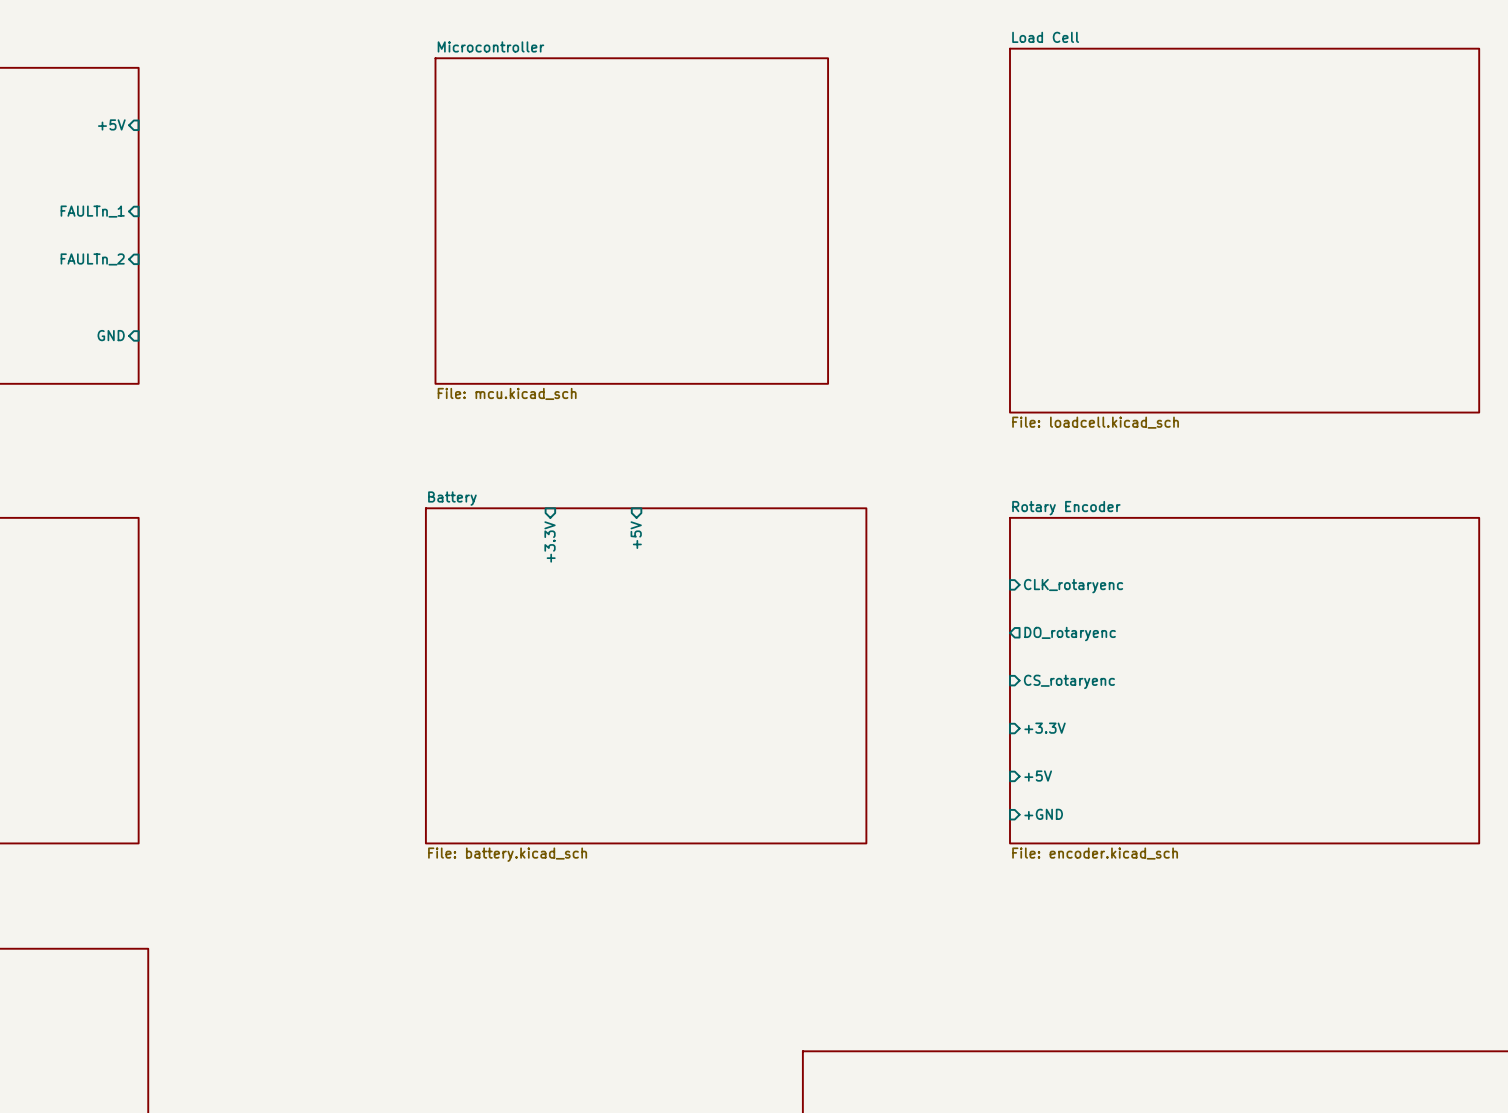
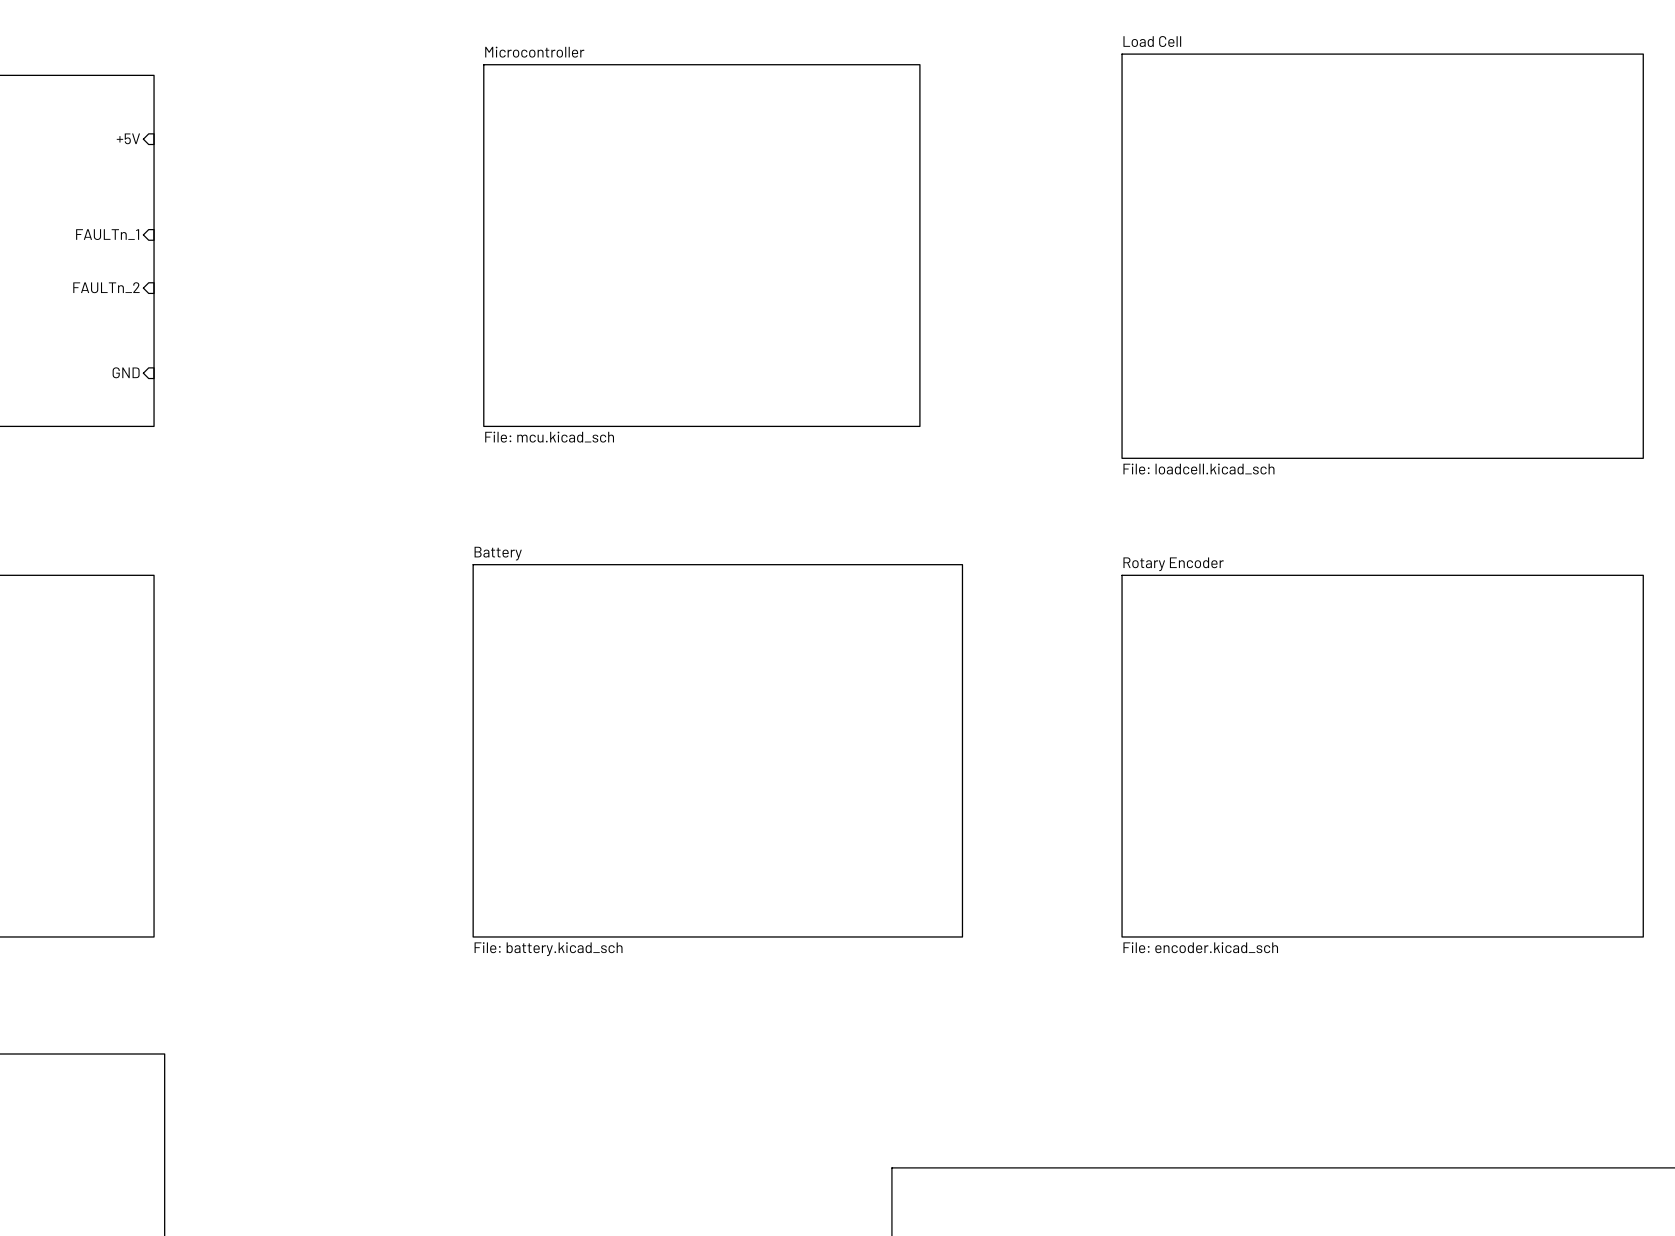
sheet pin: +5V (636, 535) -> none
sheet pin: +3.3V (550, 541) -> none
sheet pin: CLK_rotaryenc (1073, 586) -> none
sheet pin: DO_rotaryenc (1070, 634) -> none
sheet pin: CS_rotaryenc (1069, 681) -> none
sheet pin: +3.3V (1045, 728) -> none
sheet pin: +5V (1038, 776) -> none
sheet pin: +GND (1043, 814) -> none

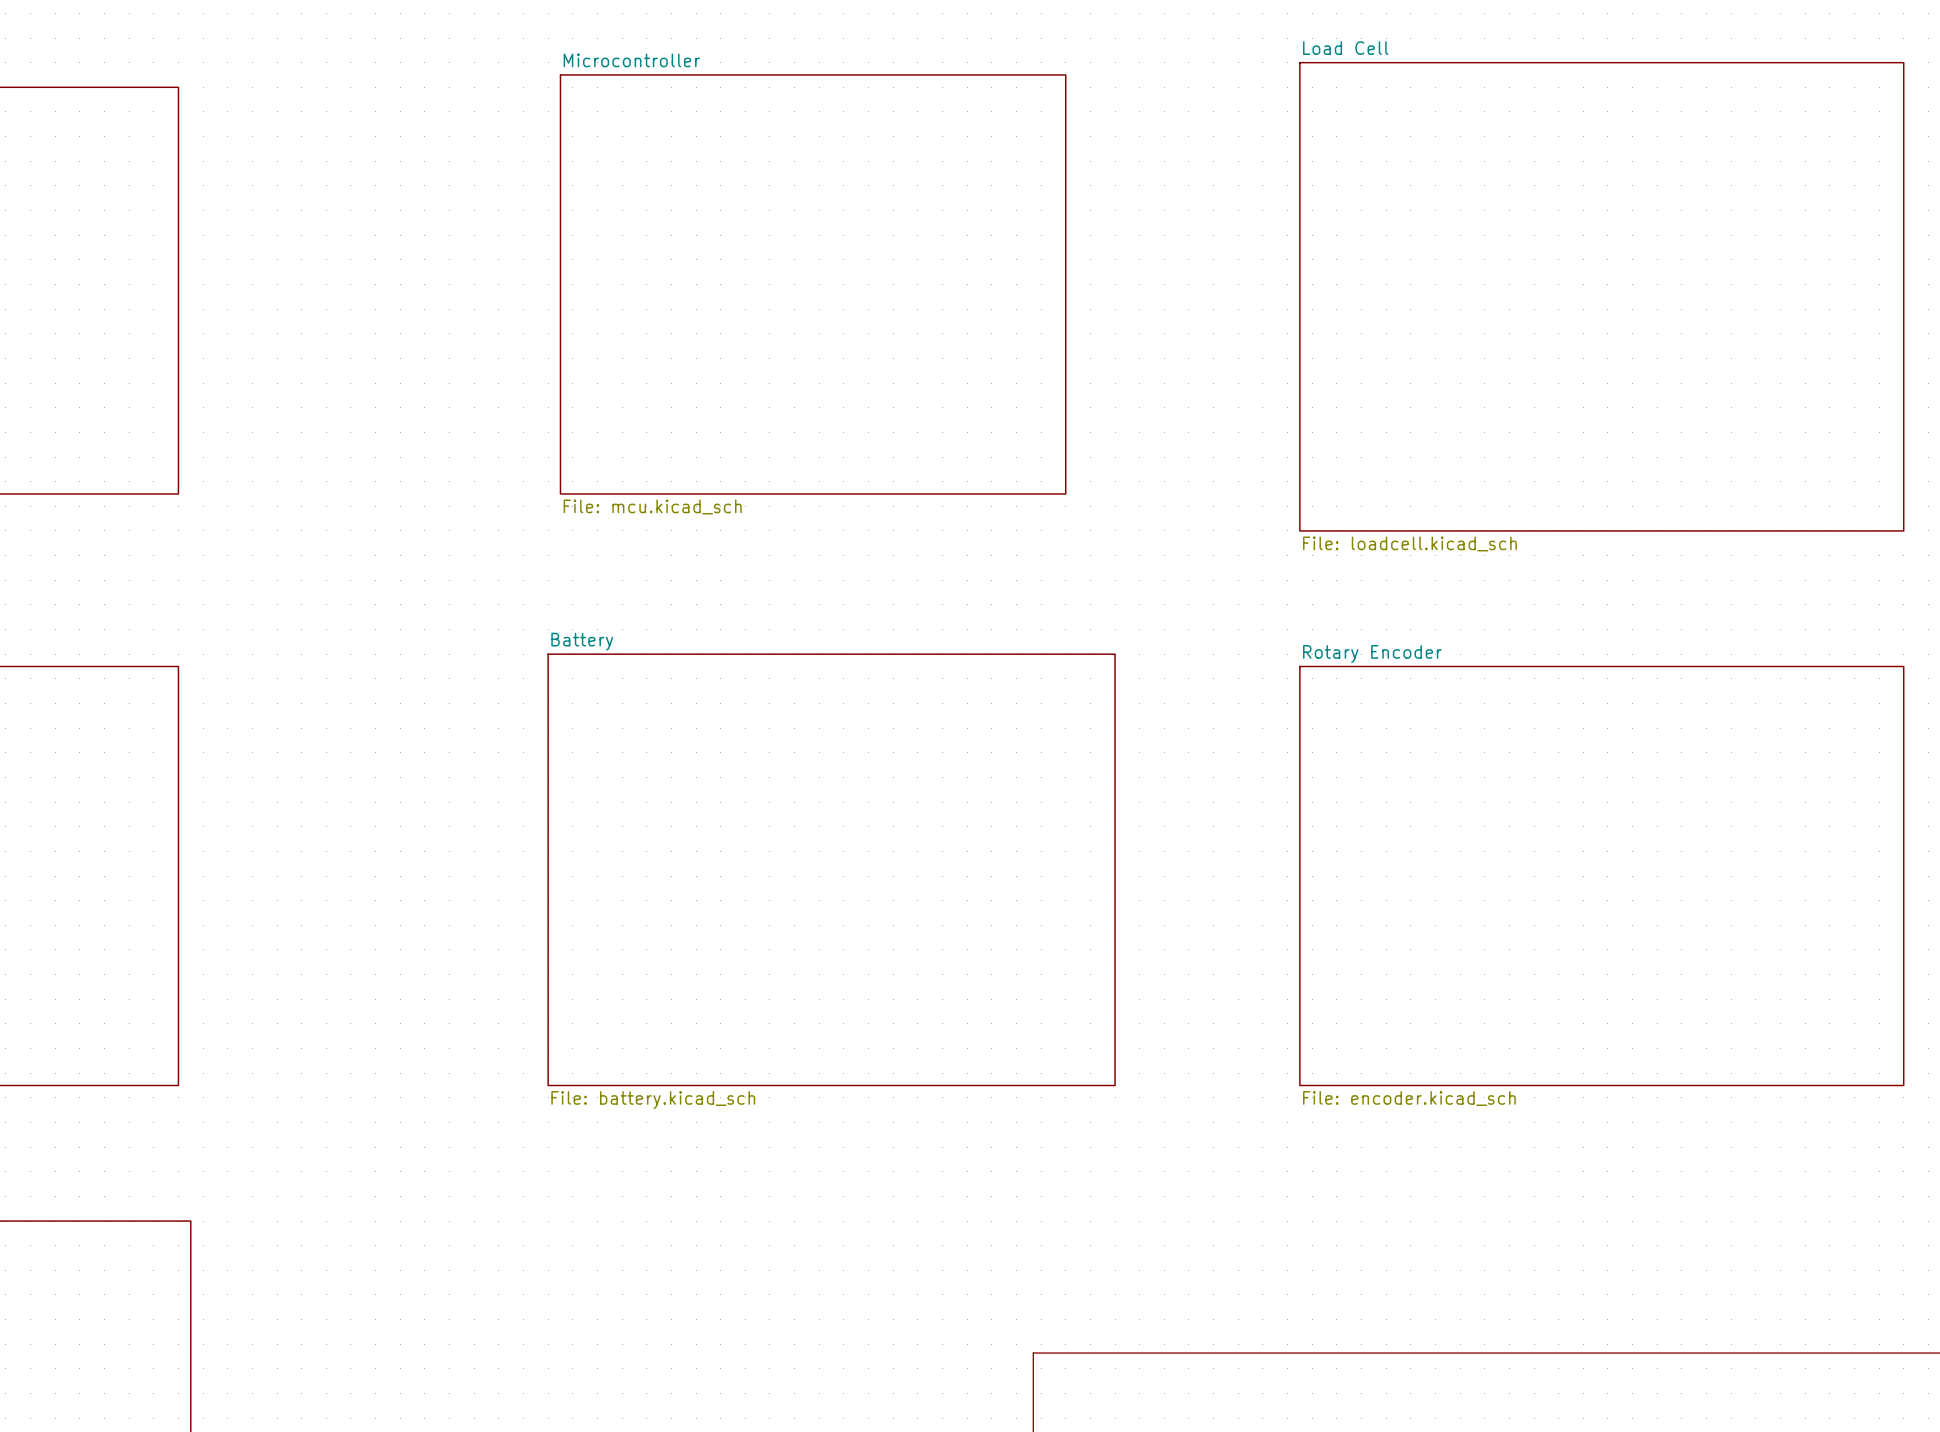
sheet pin: +5V (128, 138) -> none
sheet pin: FAULTn_1 (107, 234) -> none
sheet pin: FAULTn_2 (106, 287) -> none
sheet pin: GND (126, 372) -> none

